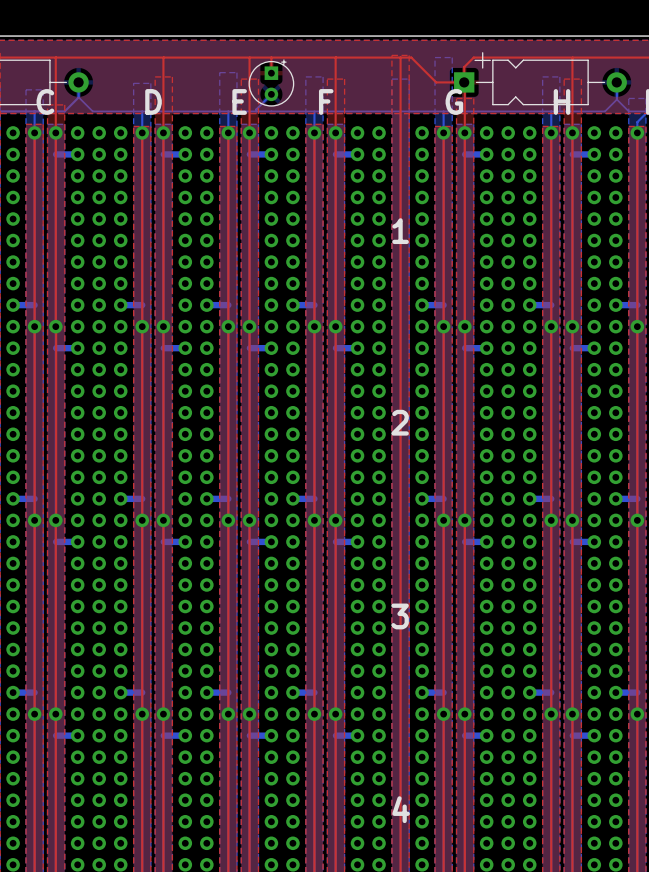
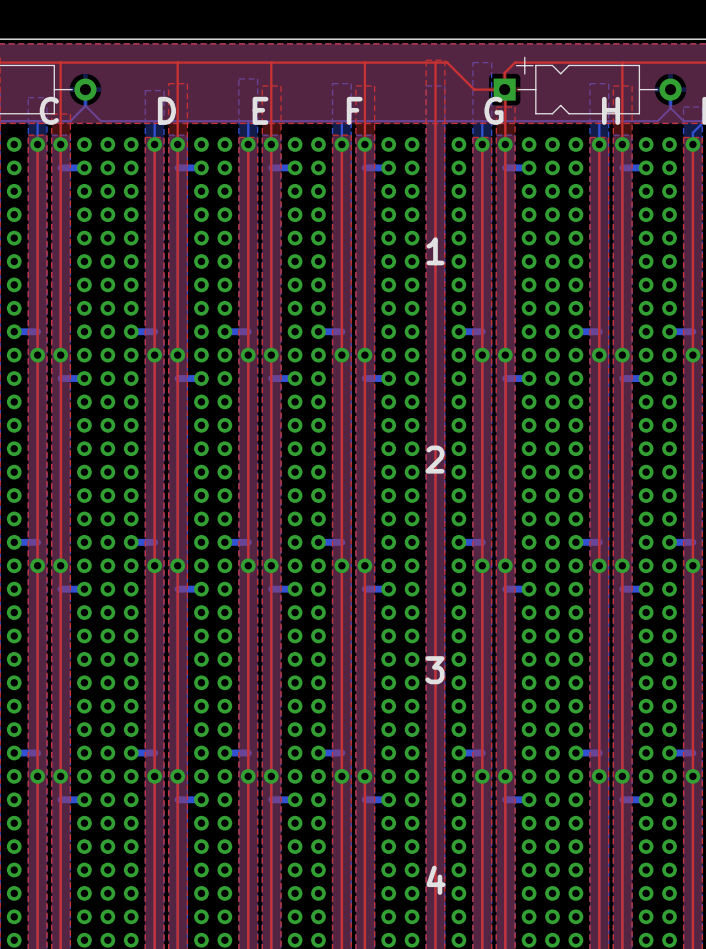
top track: (271, 57) (271, 73) -> none
part: (271, 82) -> none
bottom track: (271, 94) (256, 111) -> none

